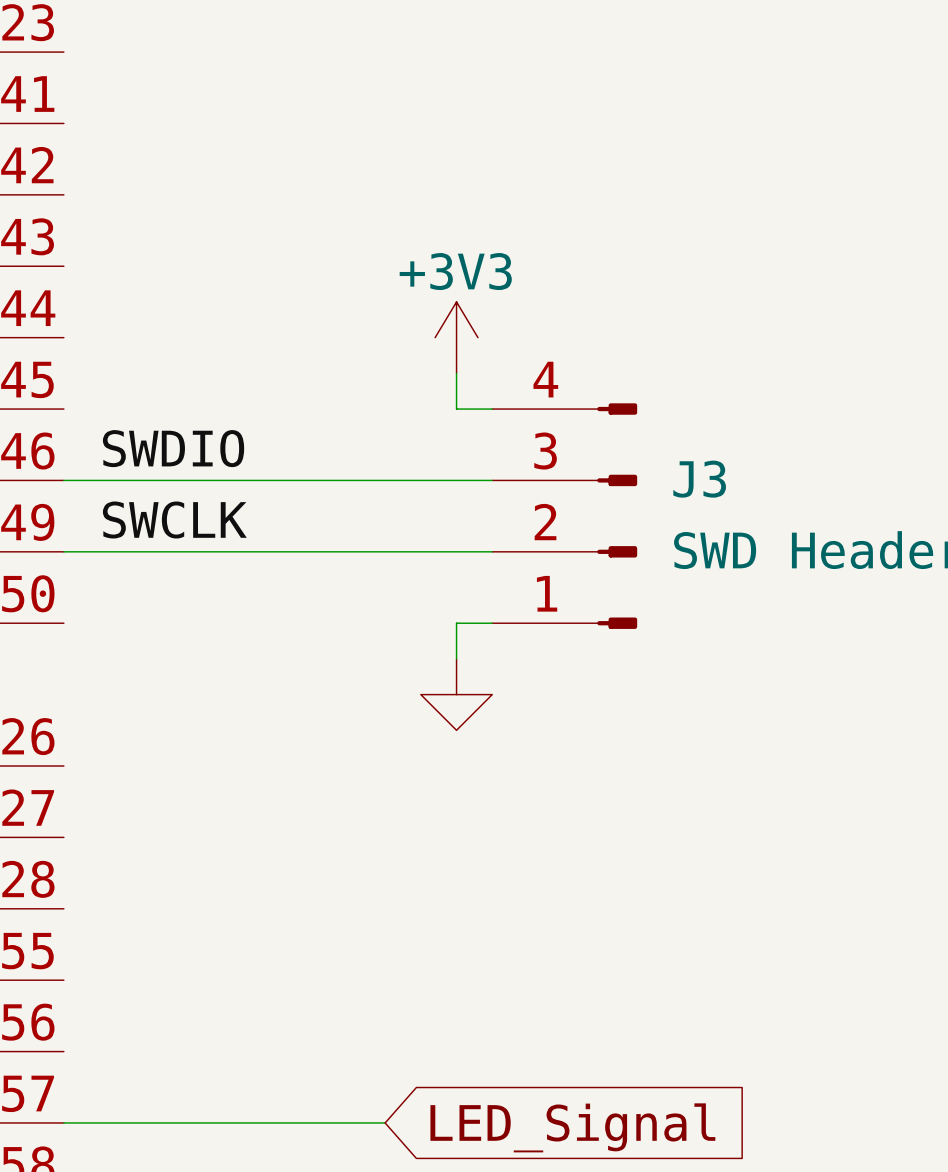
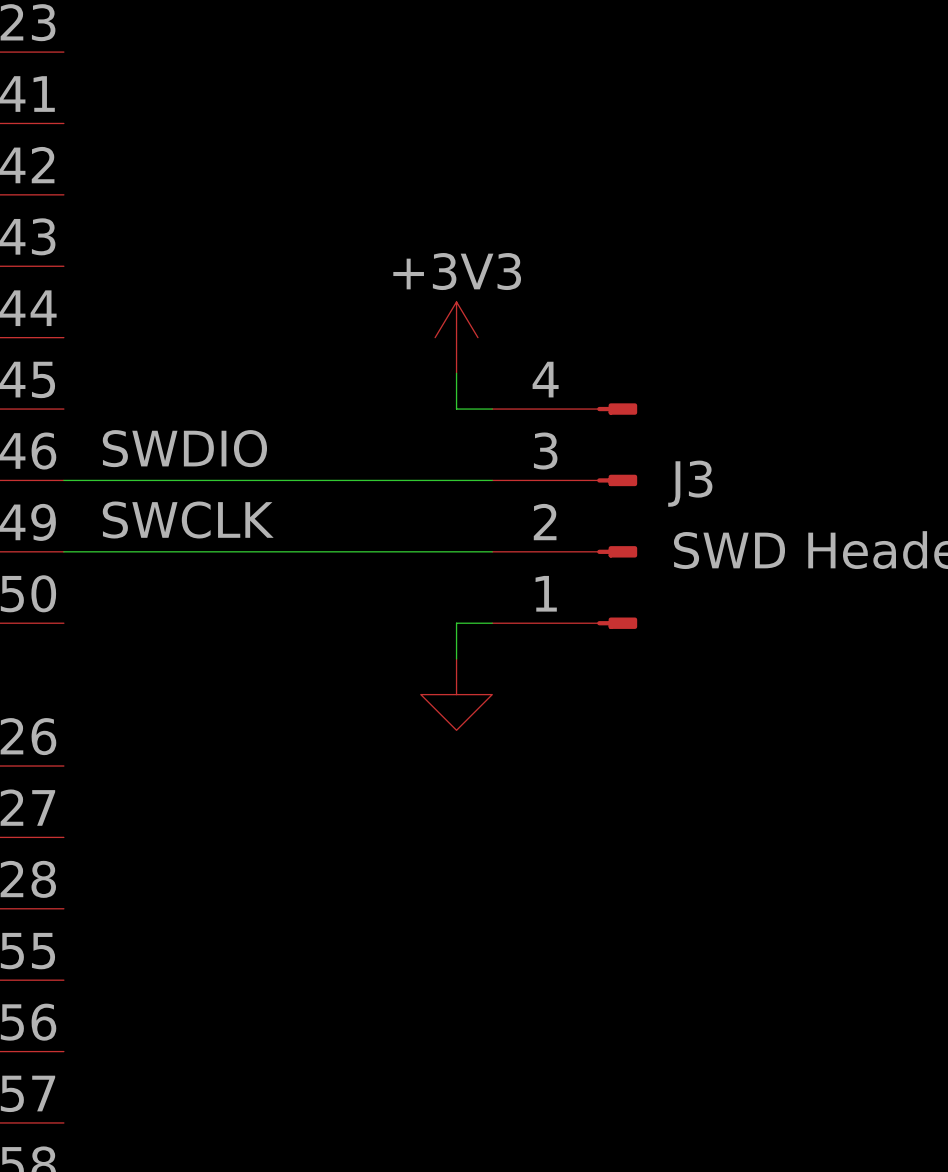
wire: (63, 1122) (385, 1122) -> none
global label: LED_Signal (572, 1127) -> none

